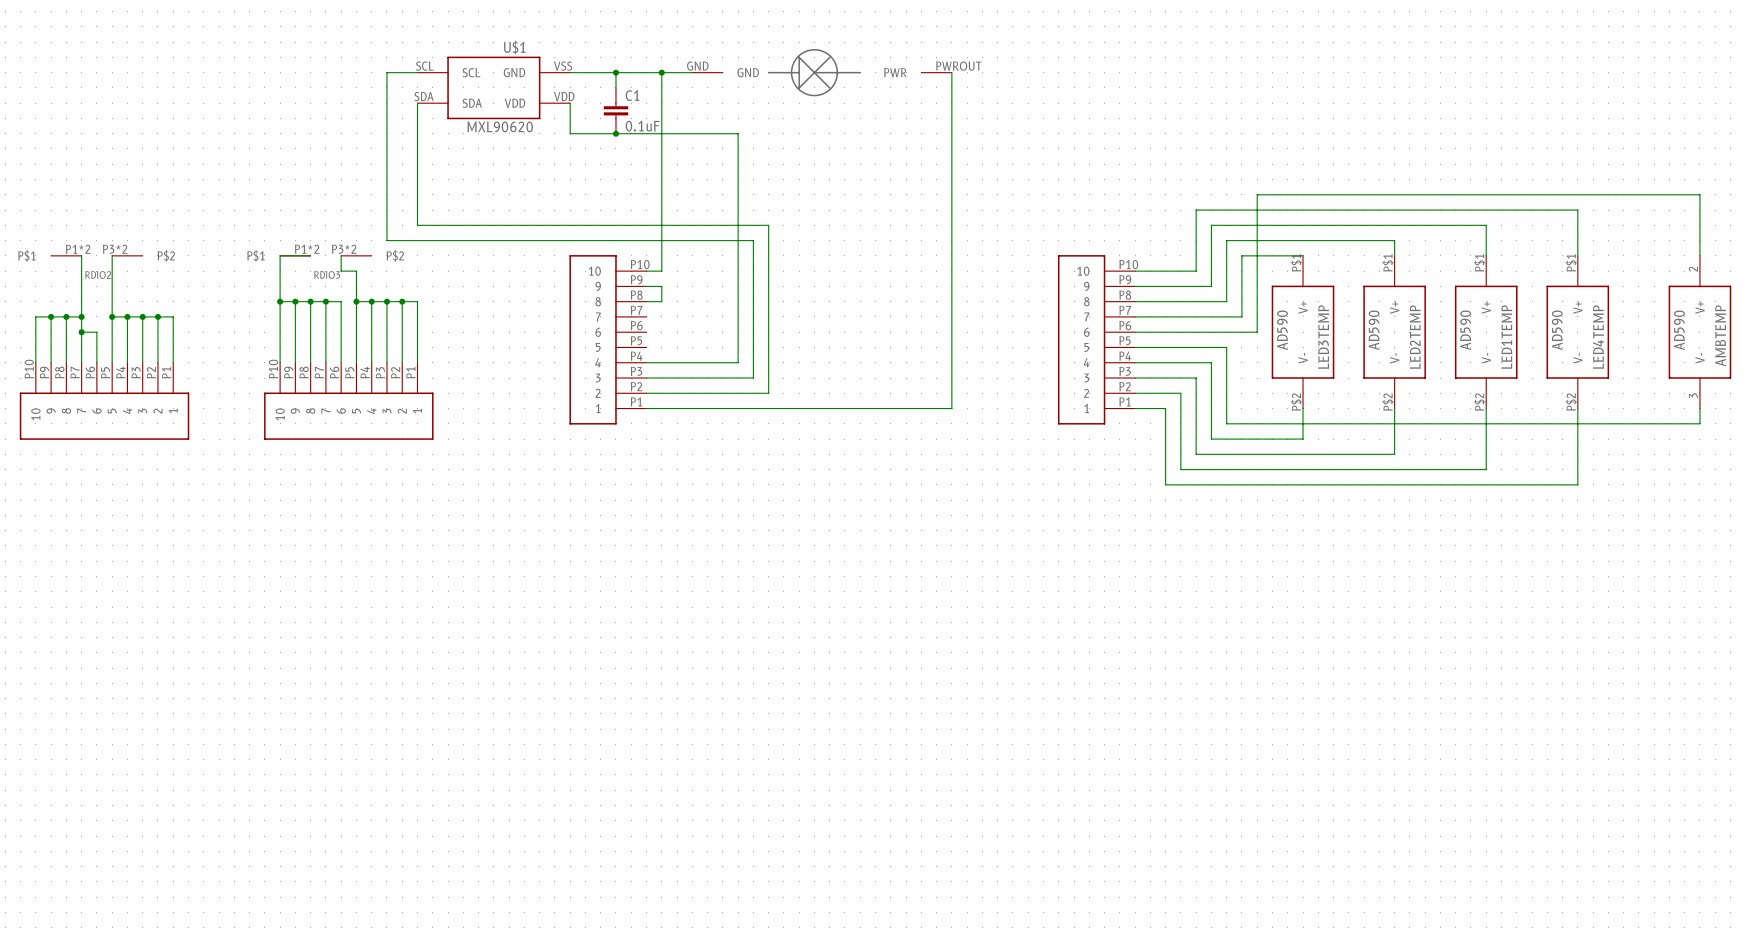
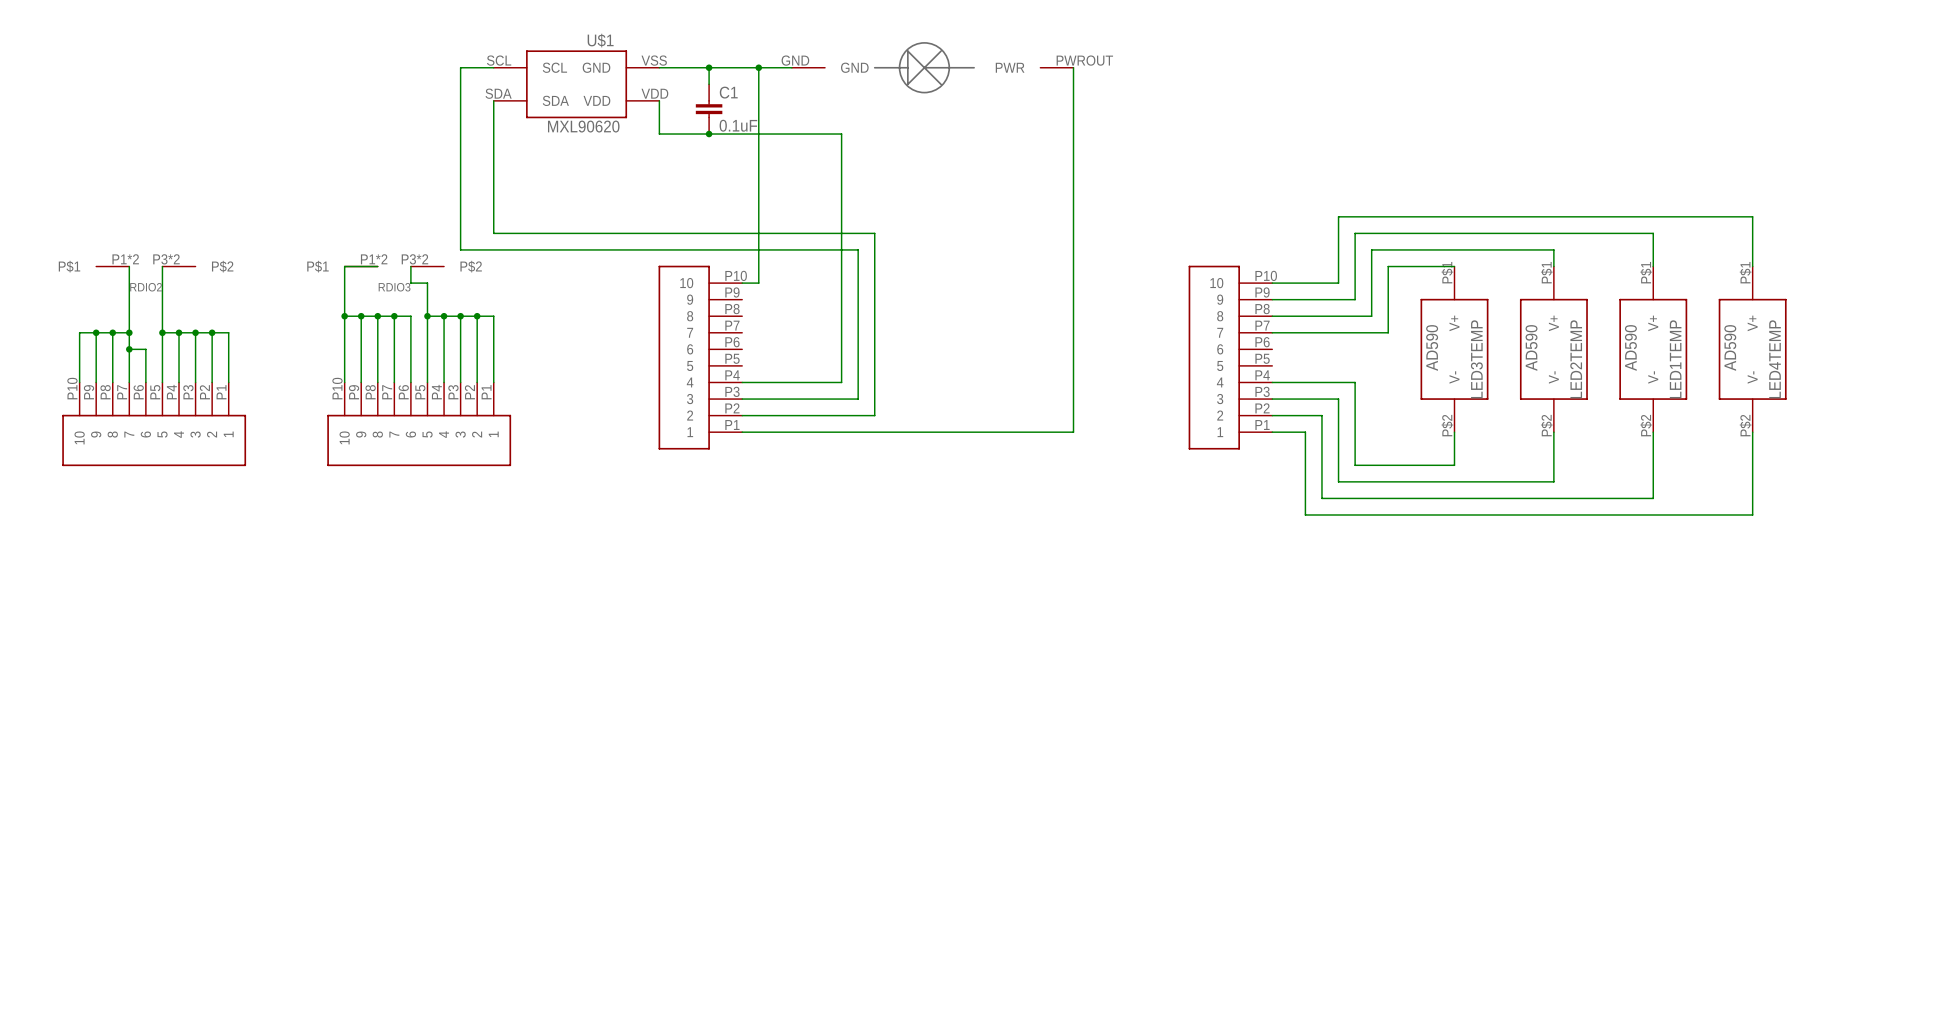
wire: (1699, 255) (1699, 194) (1257, 194) (1257, 332) (1135, 332) -> none
wire: (646, 286) (661, 286) (661, 301) (646, 301) -> none
AMBTEMP: (1699, 332) -> none
wire: (1135, 347) (1226, 347) (1226, 423) (1699, 423) (1699, 408) -> none

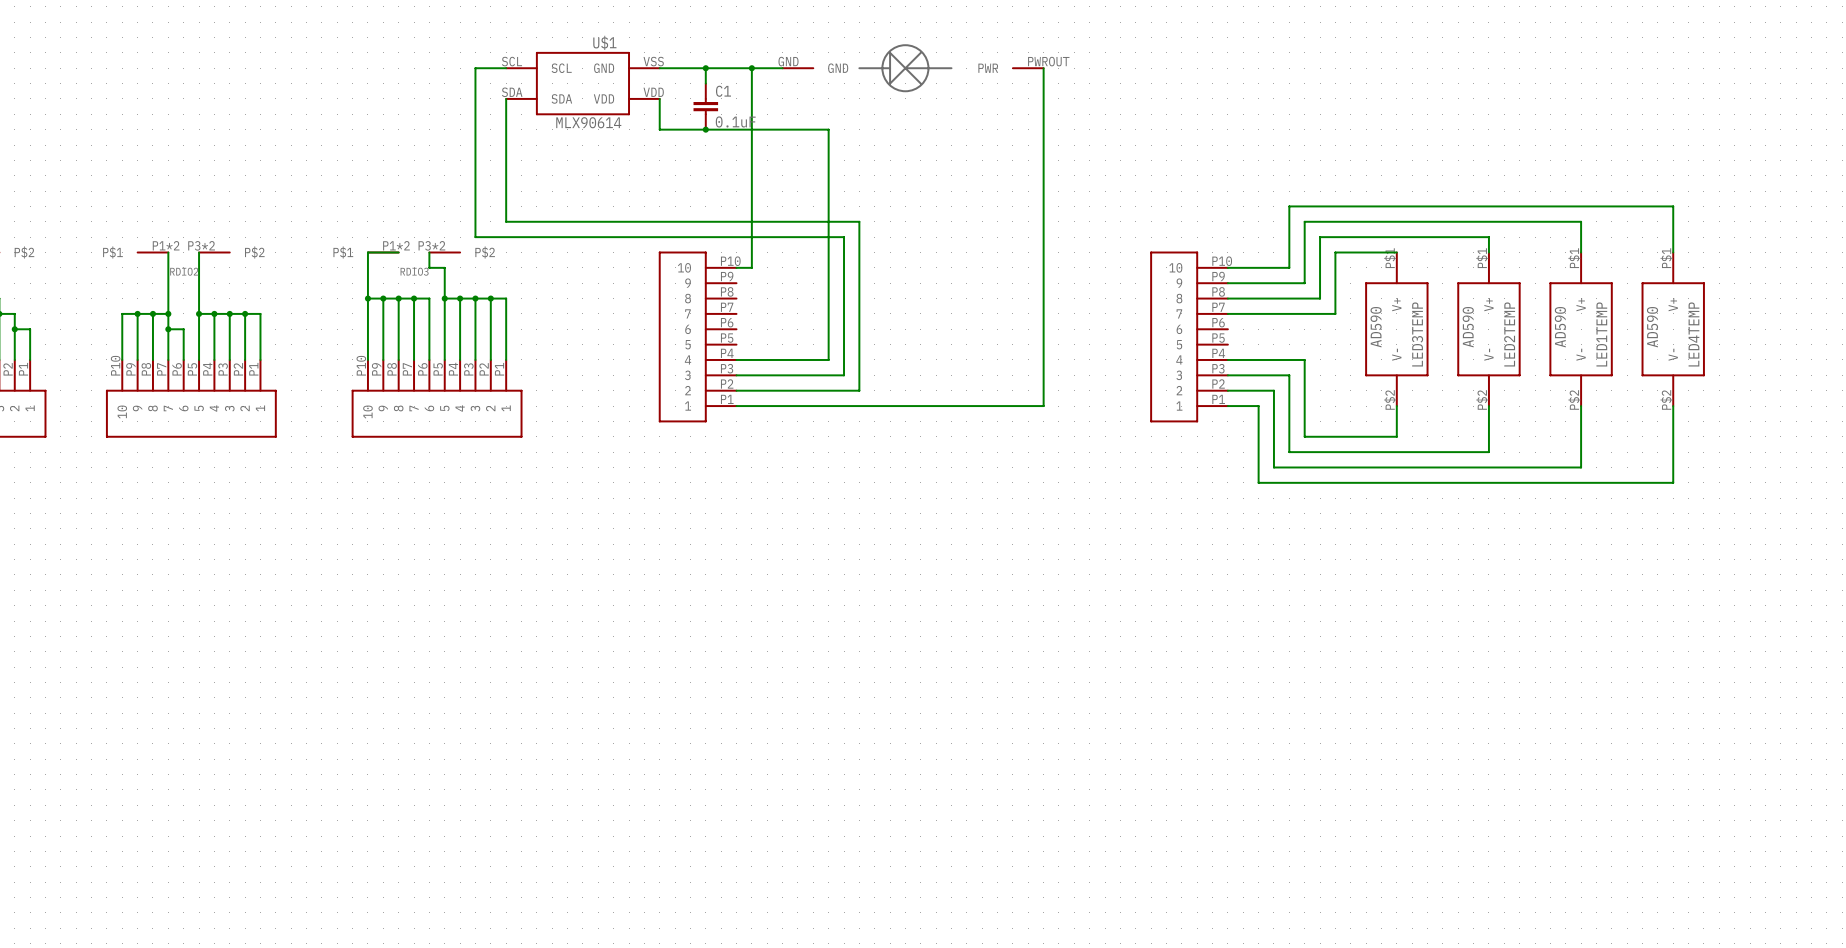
U$1 text: MXL90620 (583, 126) -> MLX90614 (588, 122)

